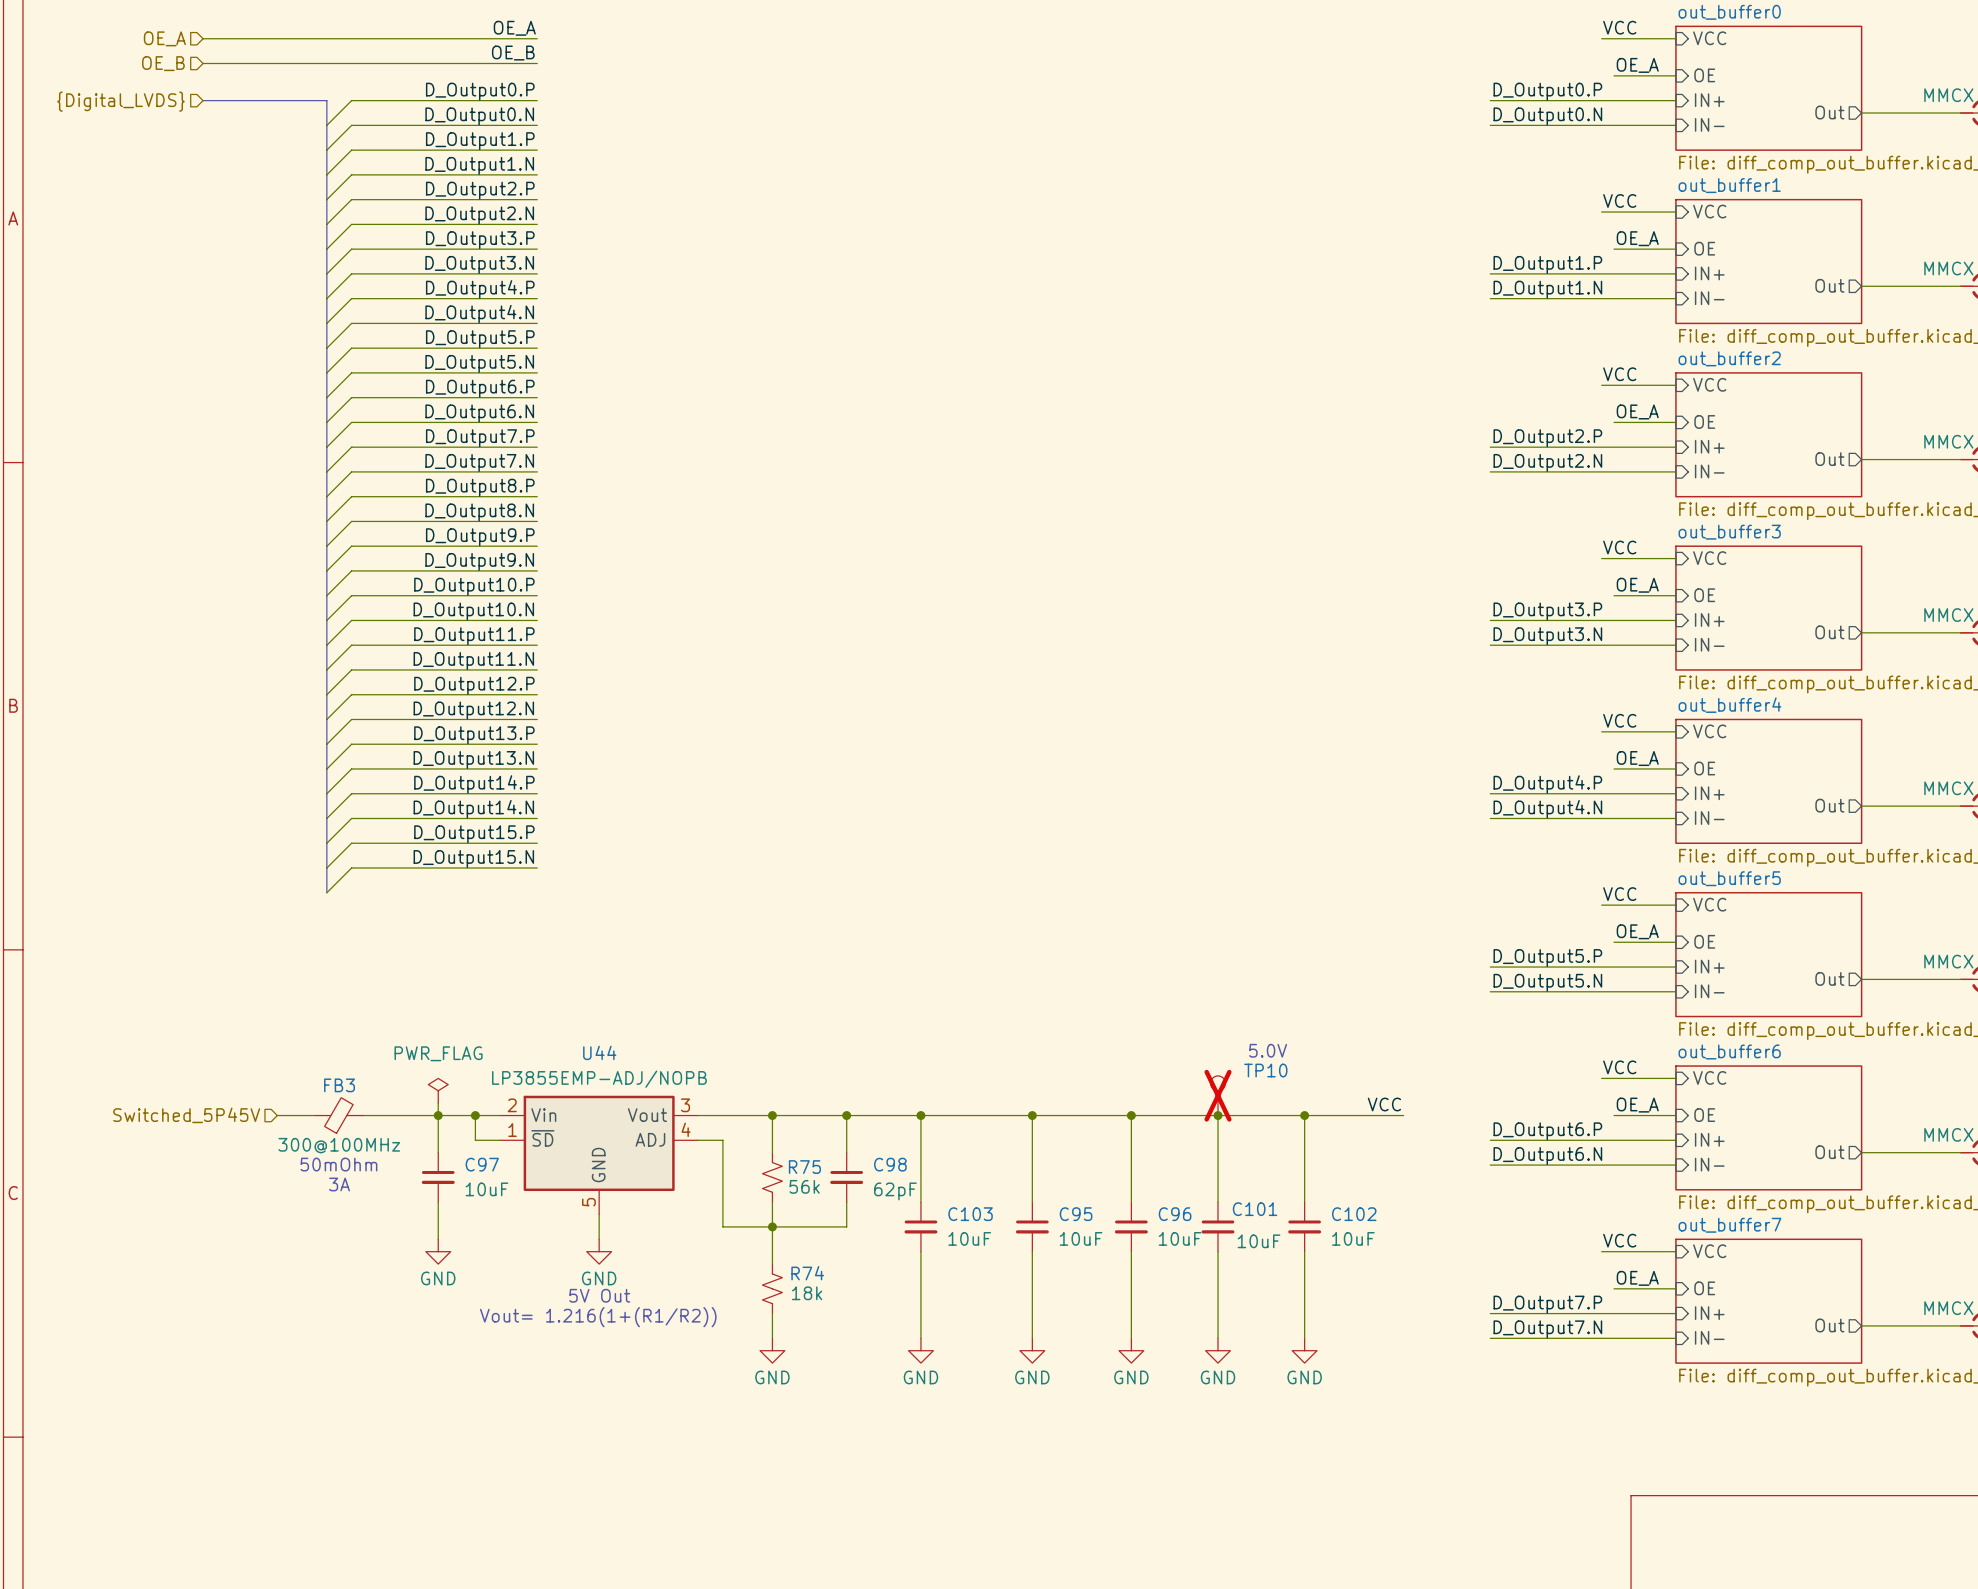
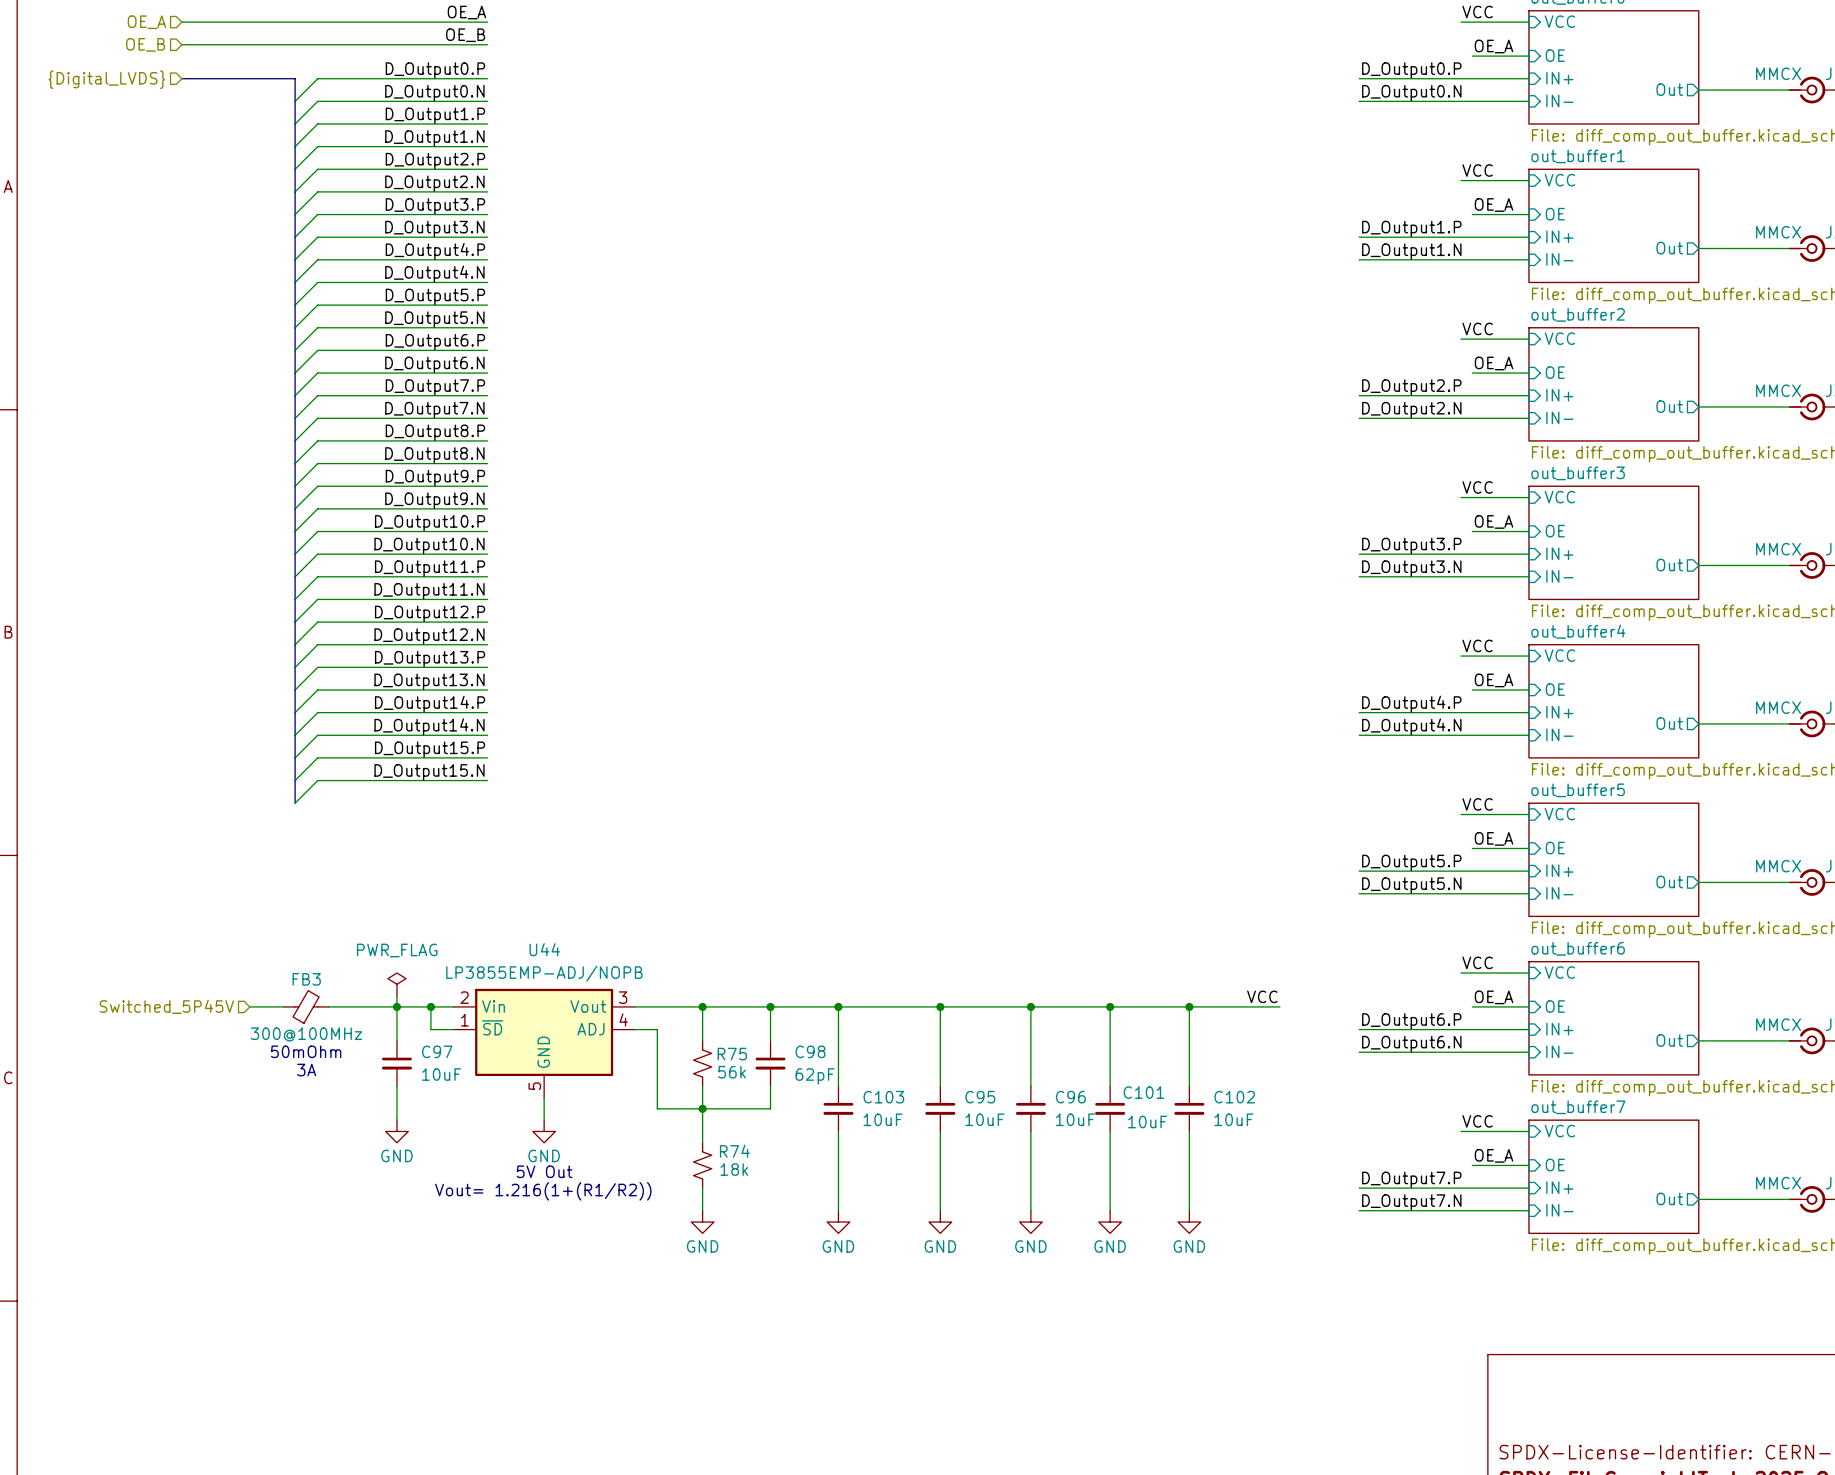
text: 5.0V (1268, 1050) -> none
TP10: (1218, 1095) -> none

